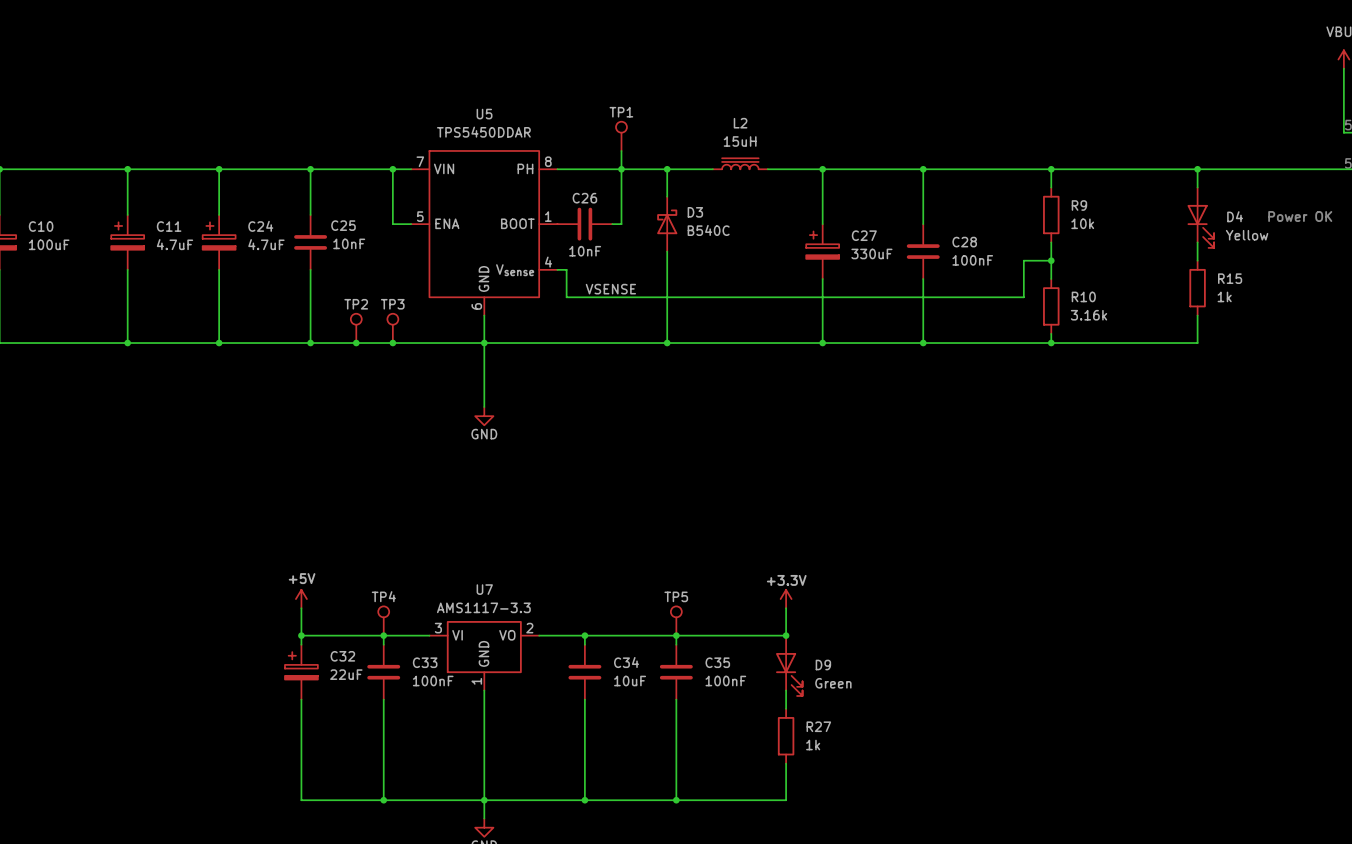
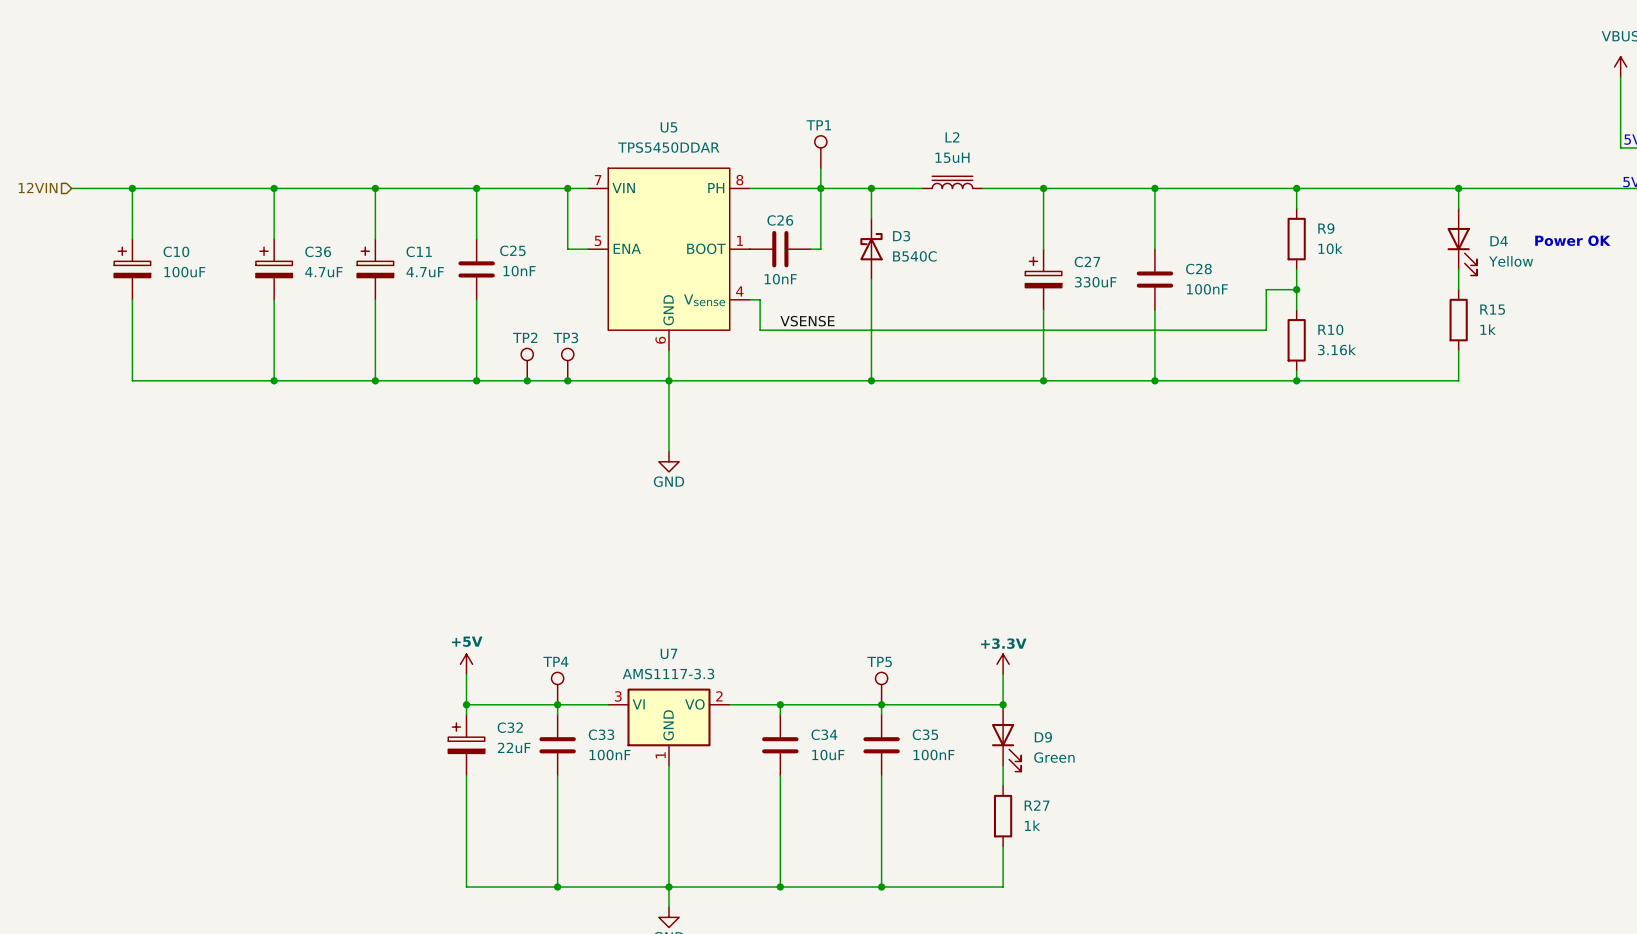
C11 name: C11 (169, 226) -> C36 (318, 251)
C24 name: C24 (260, 226) -> C11 (419, 251)

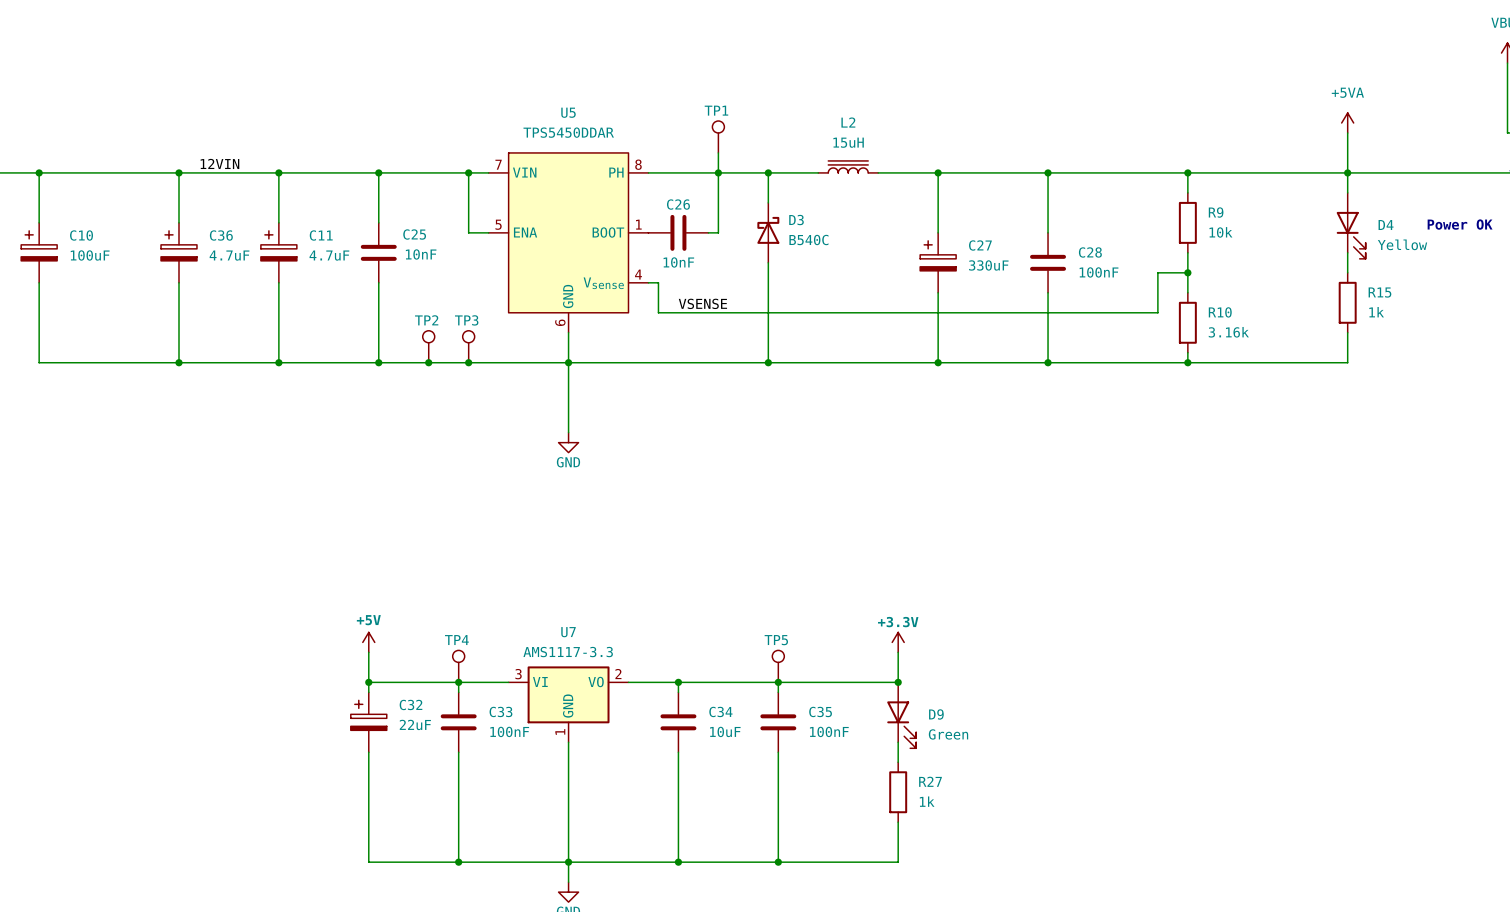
power symbol: none -> +5VA (1347, 123)
wire: none -> (1347, 132) (1347, 172)
label: none -> 12VIN (219, 163)

